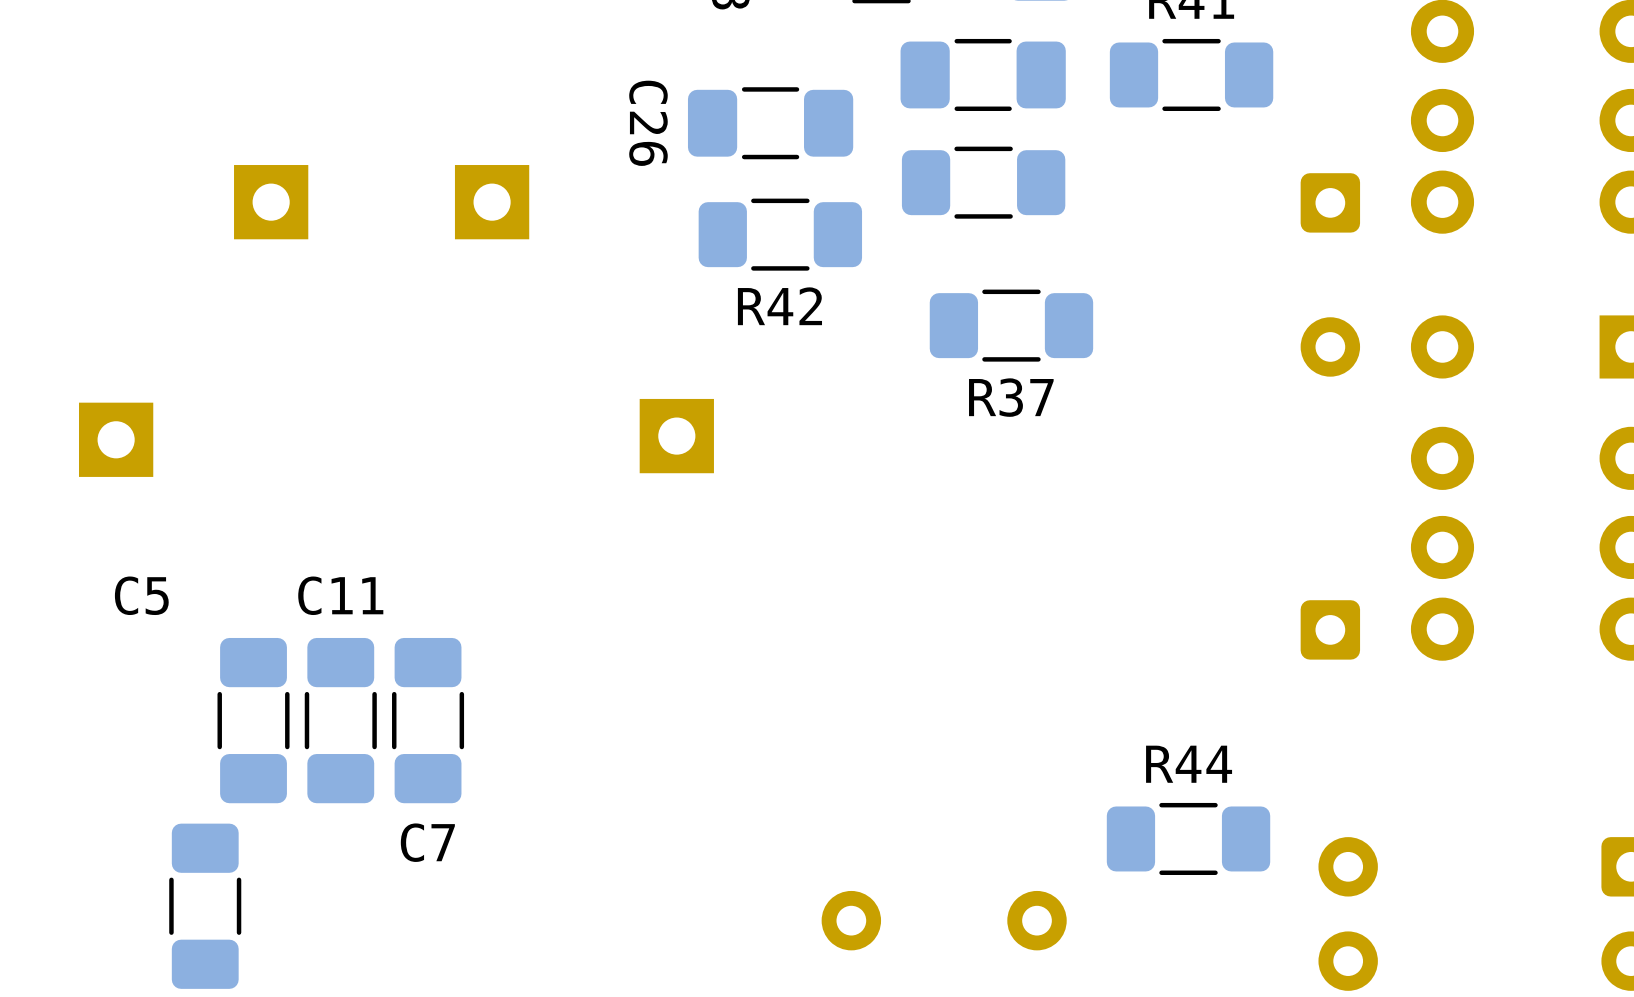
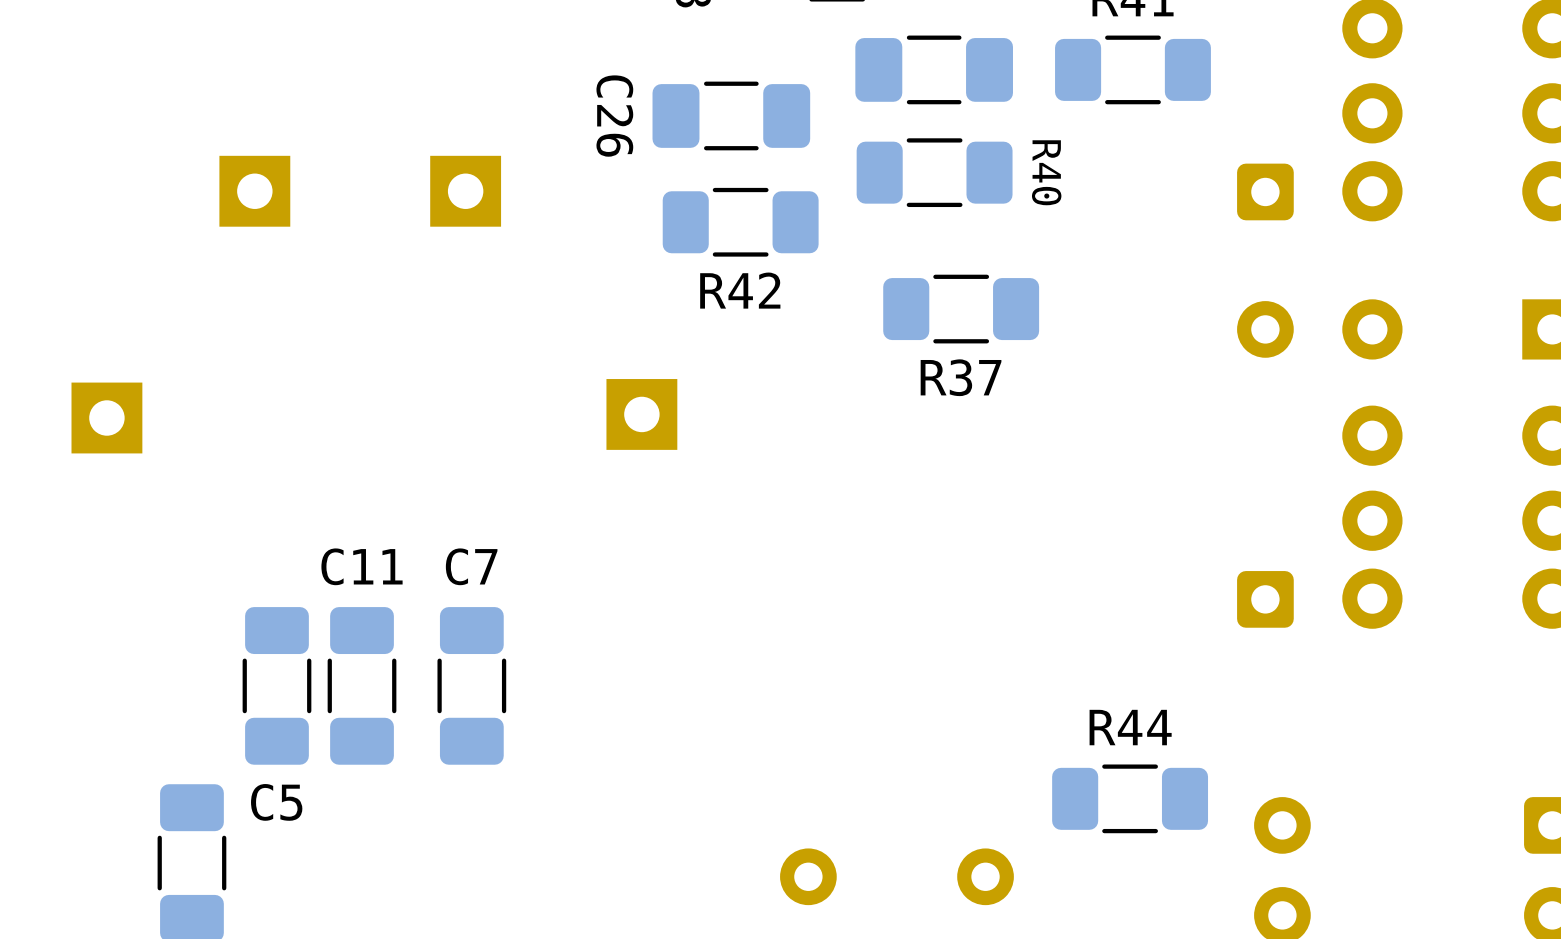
R40 name: none -> R40 (1046, 172)
C5 name position: C5 (141, 595) -> C5 (276, 802)
C5 position: (253, 720) -> (276, 685)
C11 position: (340, 720) -> (362, 685)
C7 position: (428, 720) -> (471, 685)
C7 name position: C7 (427, 842) -> C7 (471, 566)

